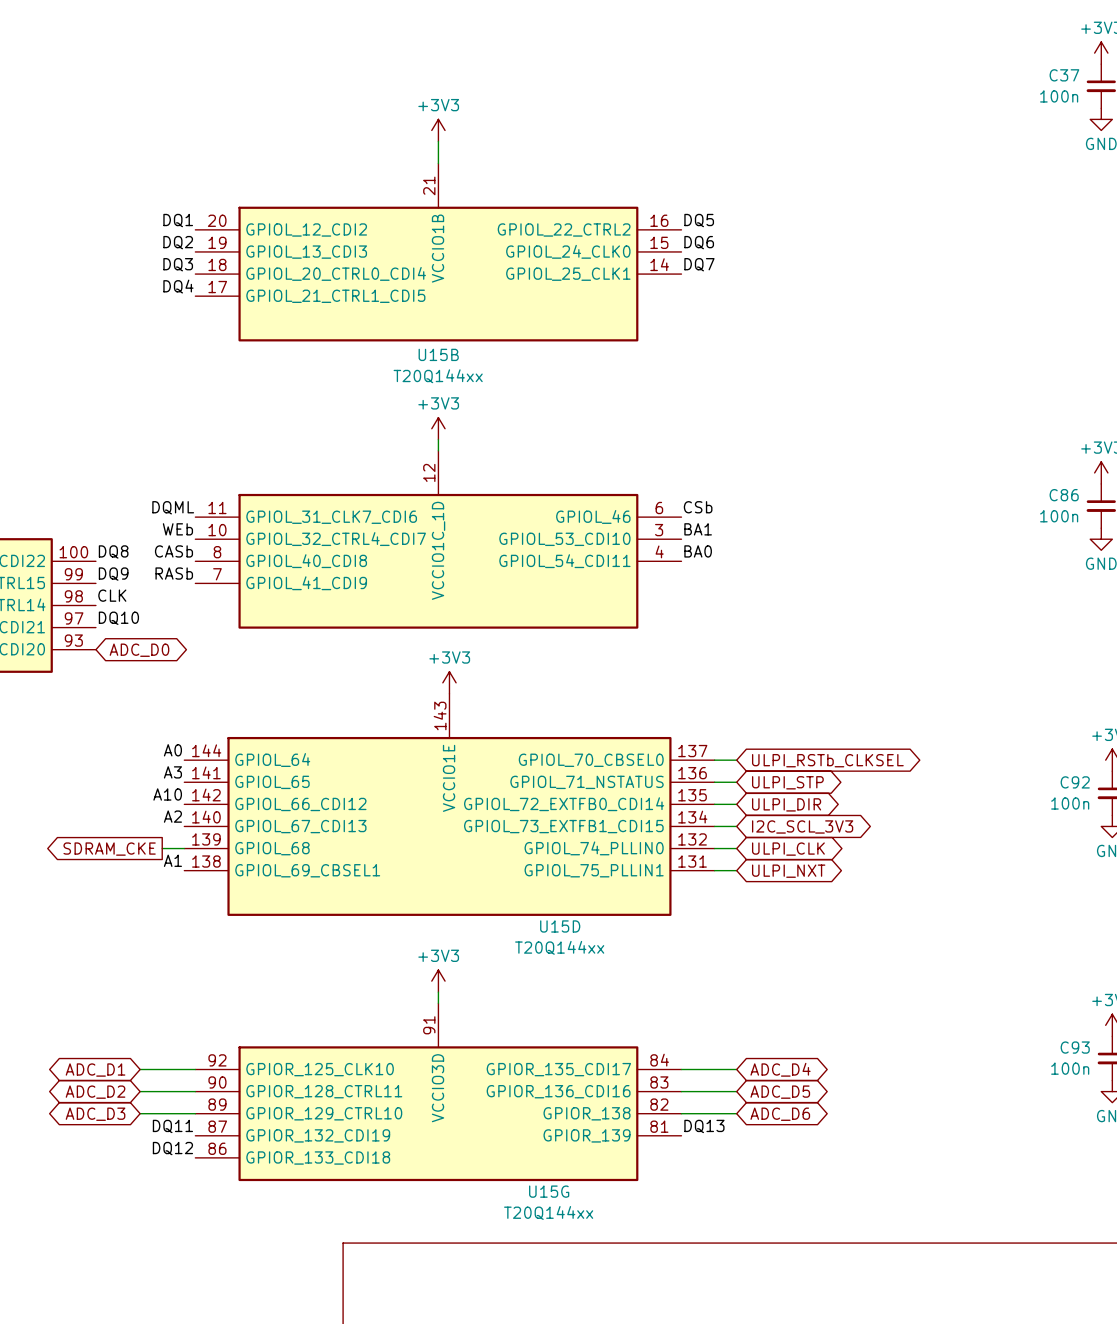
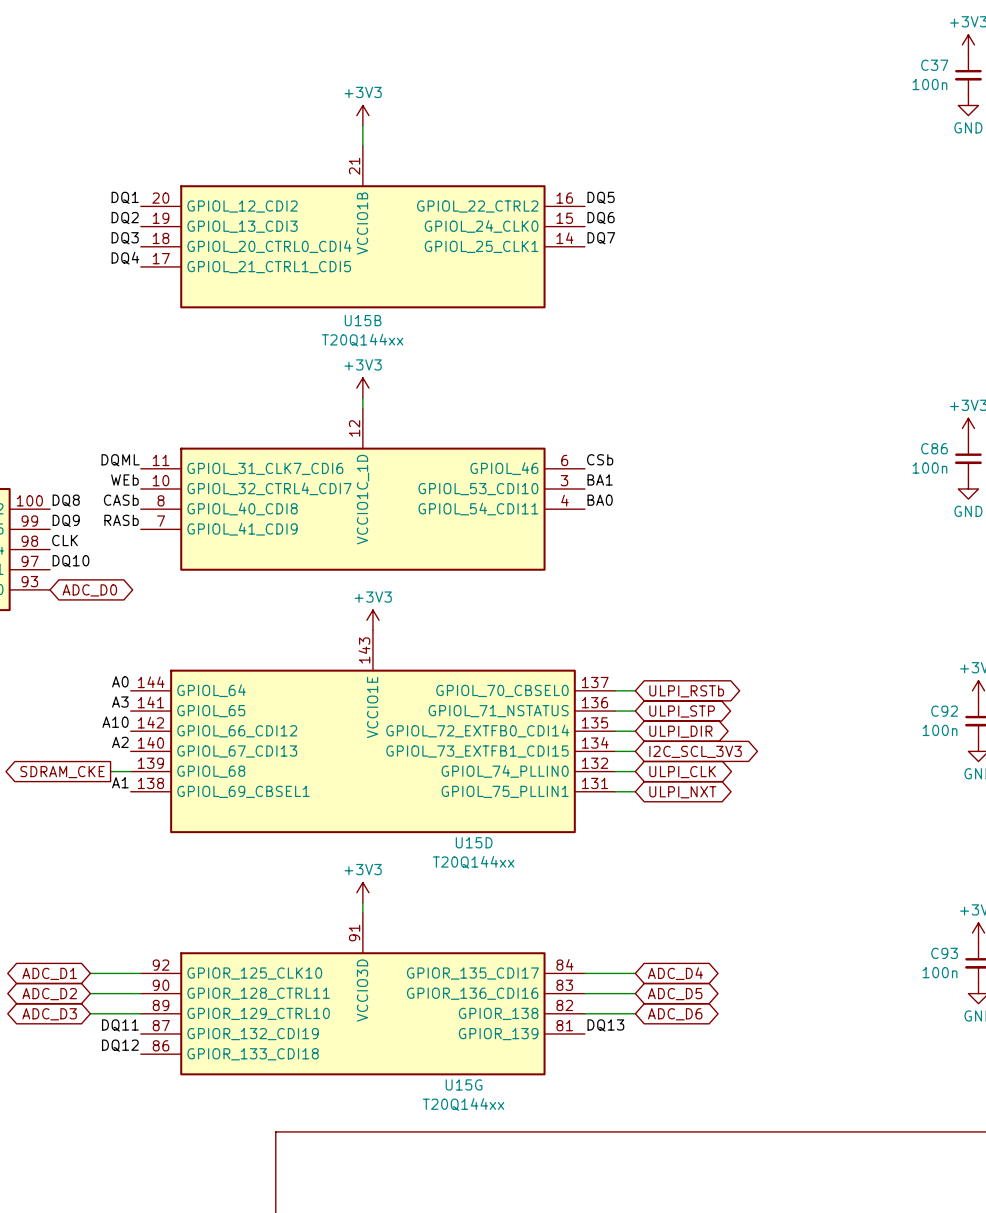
global label: ULPI_RSTb_CLKSEL (827, 760) -> ULPI_RSTb (686, 691)

